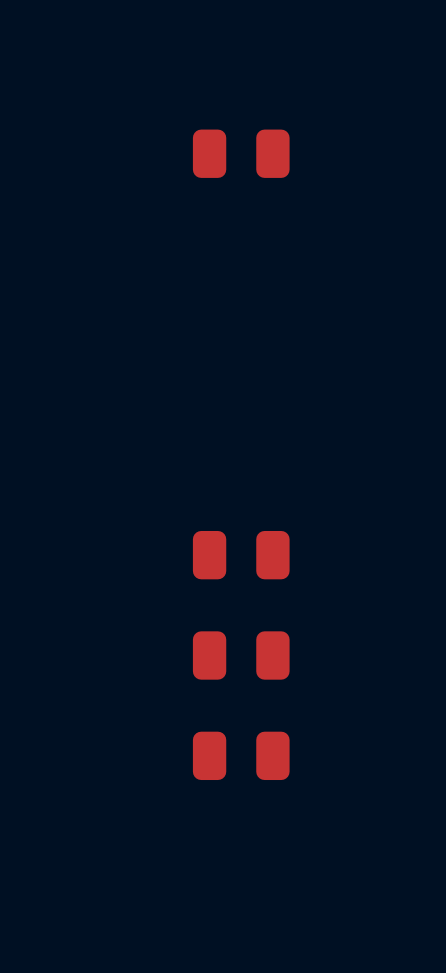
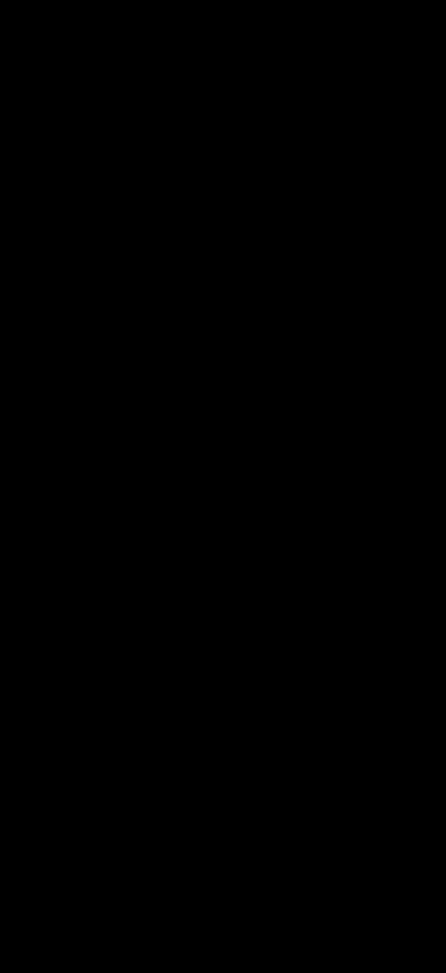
part: (241, 153) -> none
part: (241, 555) -> none
part: (241, 655) -> none
part: (241, 755) -> none

